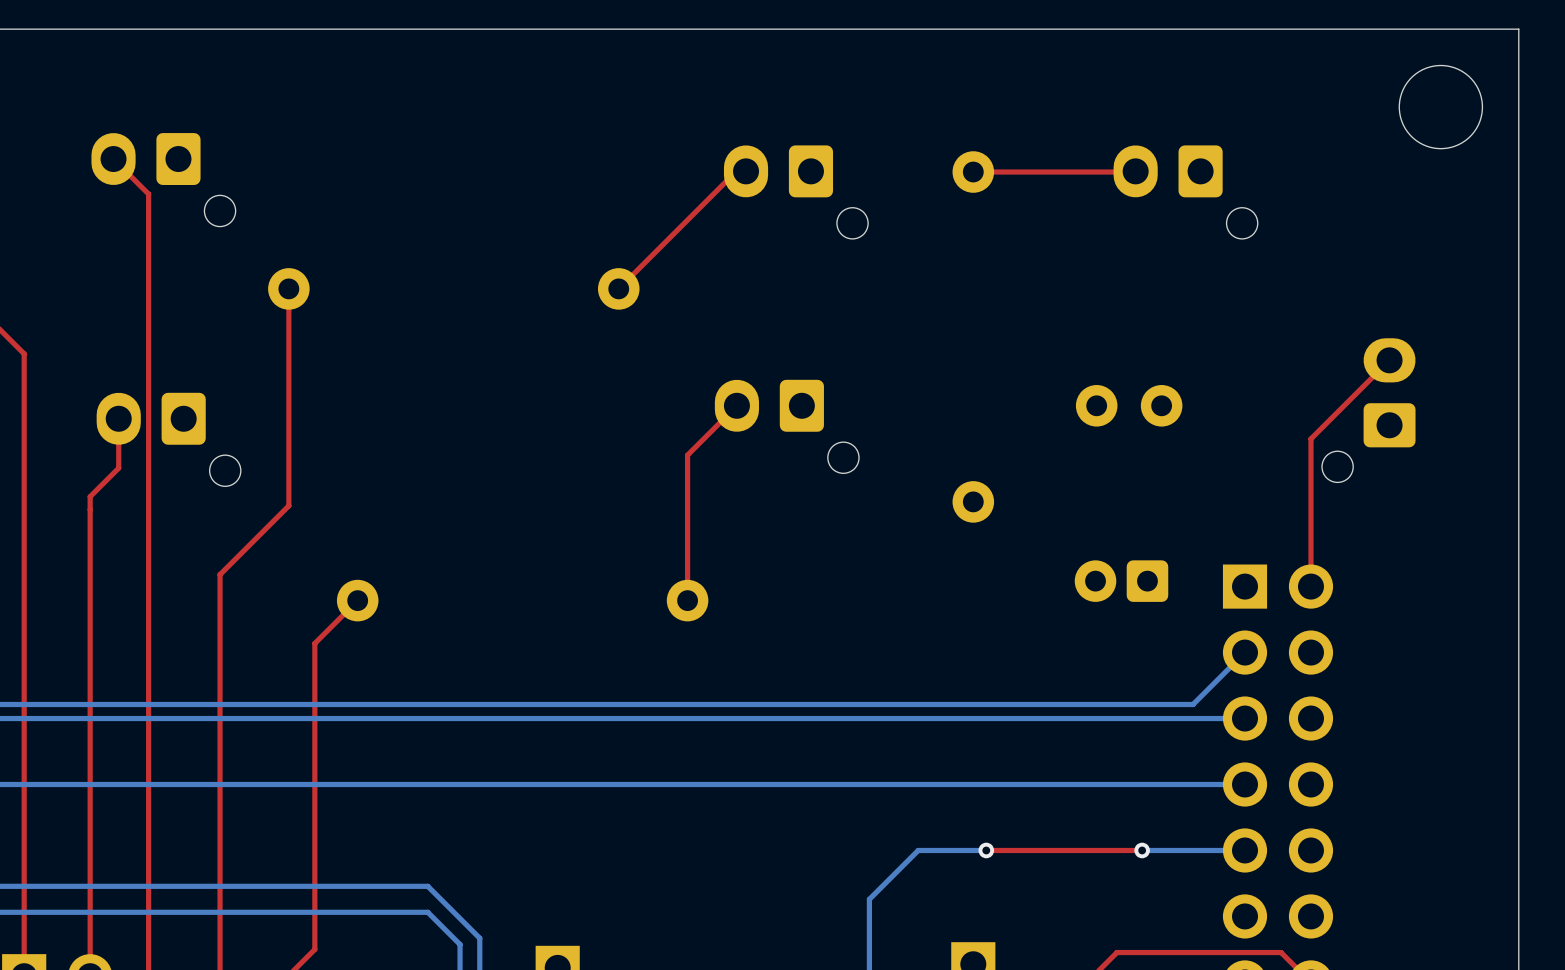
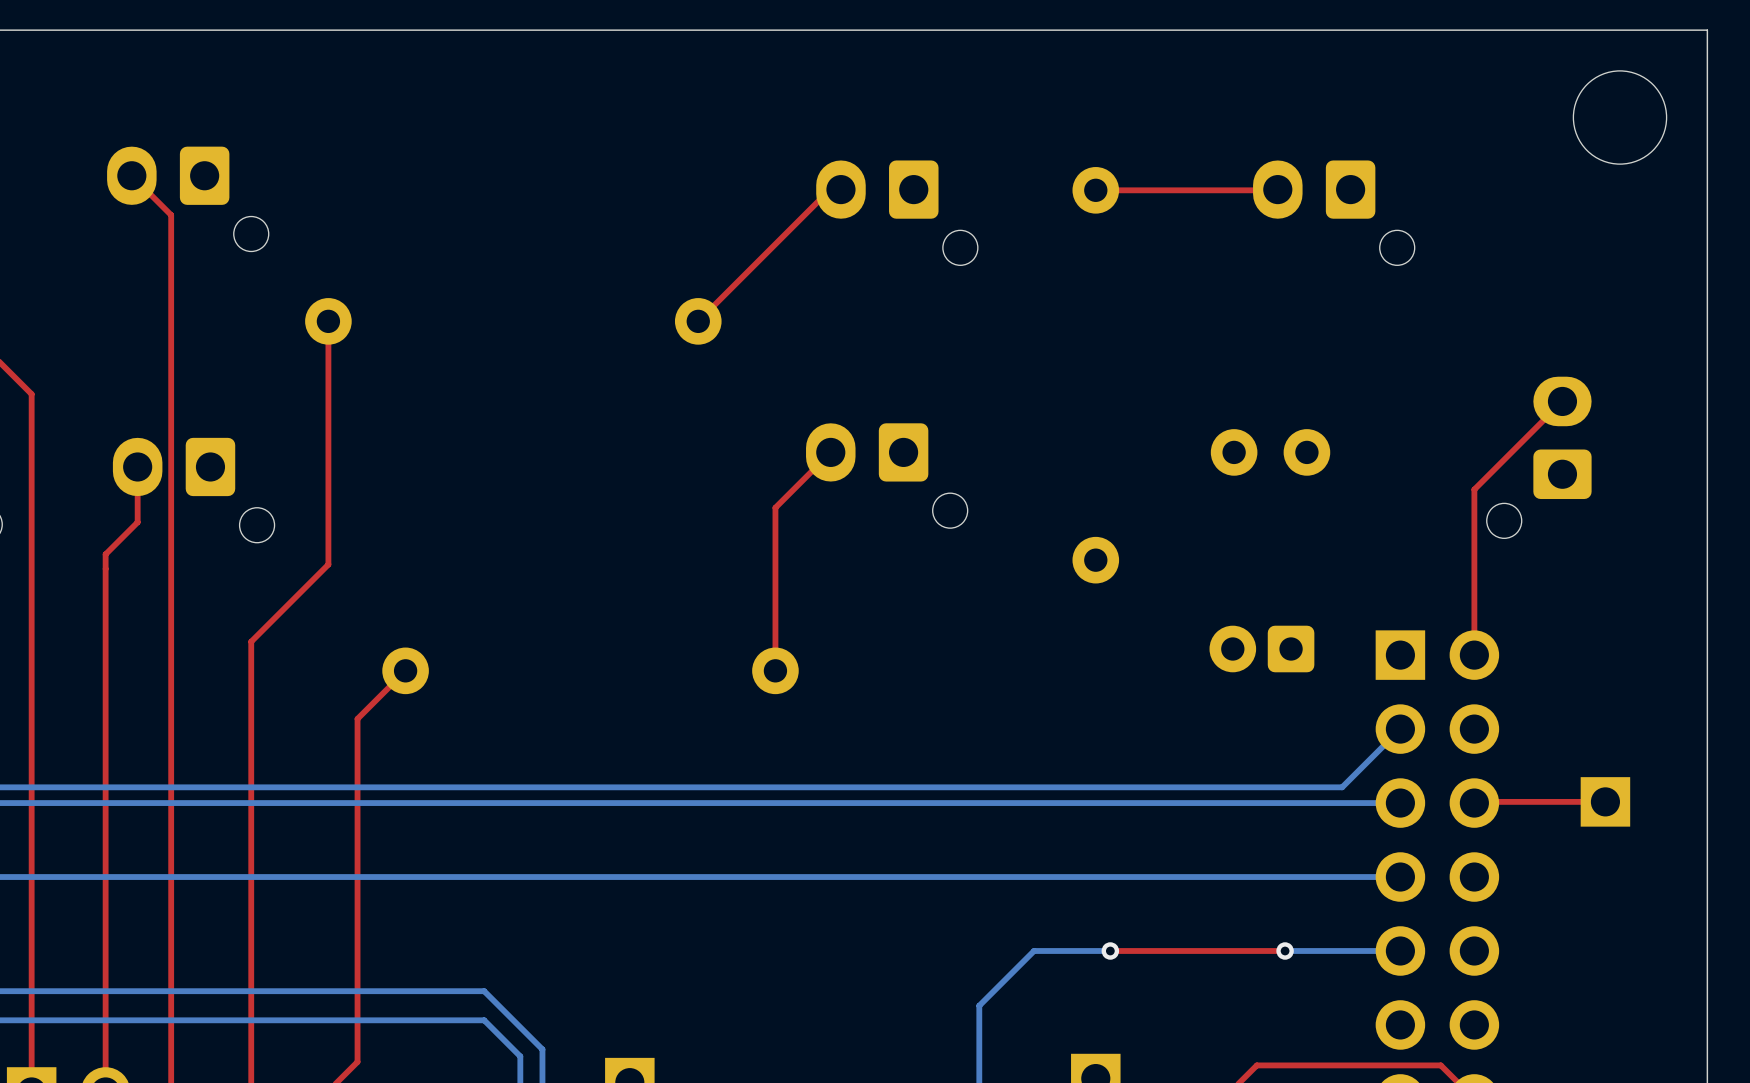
top track: none -> (1605, 801) (1474, 803)
part: none -> (1605, 801)

